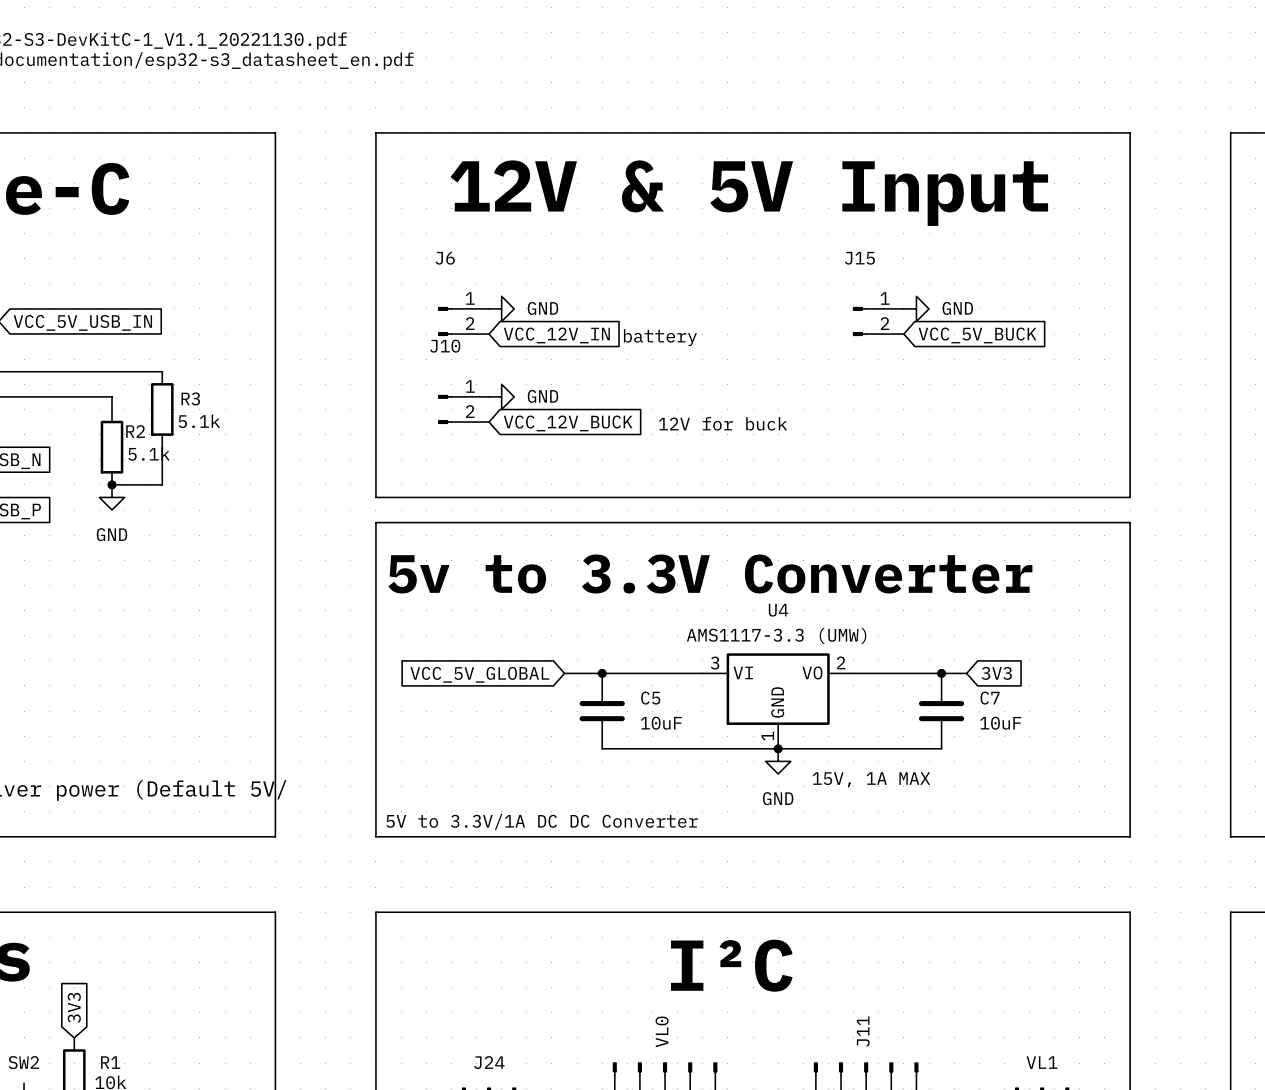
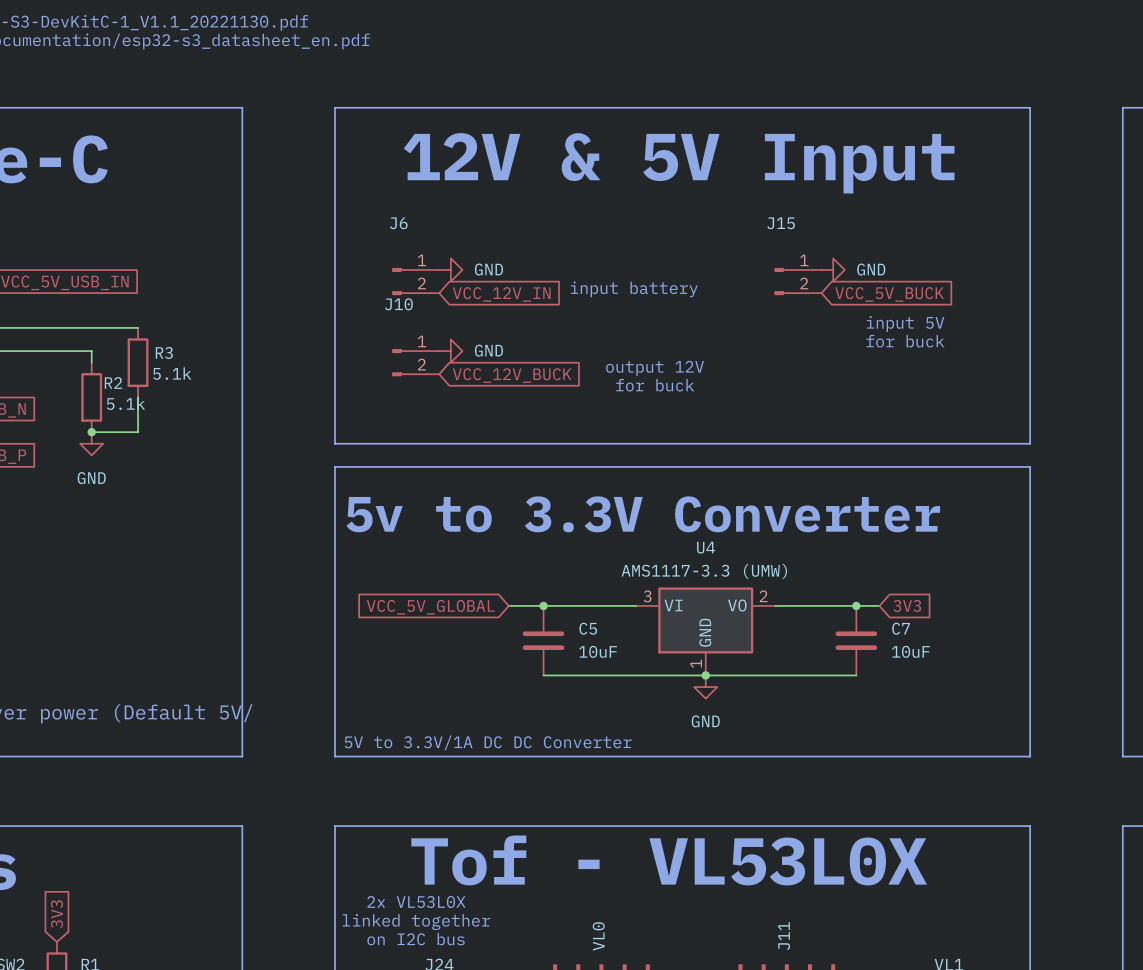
text: battery (660, 337) -> input battery (634, 289)
text: none -> input 5V (905, 324)
text: none -> for buck (905, 341)
text: none -> output 12V (655, 368)
text: 12V for buck (723, 423) -> for buck (655, 385)
text: 15V, 1A MAX (871, 779) -> none
text: none -> Tof - VL53L0X (669, 860)
text: I²C (731, 965) -> none
text: none -> 2x VL53L0X (416, 902)
text: none -> linked together (416, 922)
text: none -> on I2C bus (416, 939)

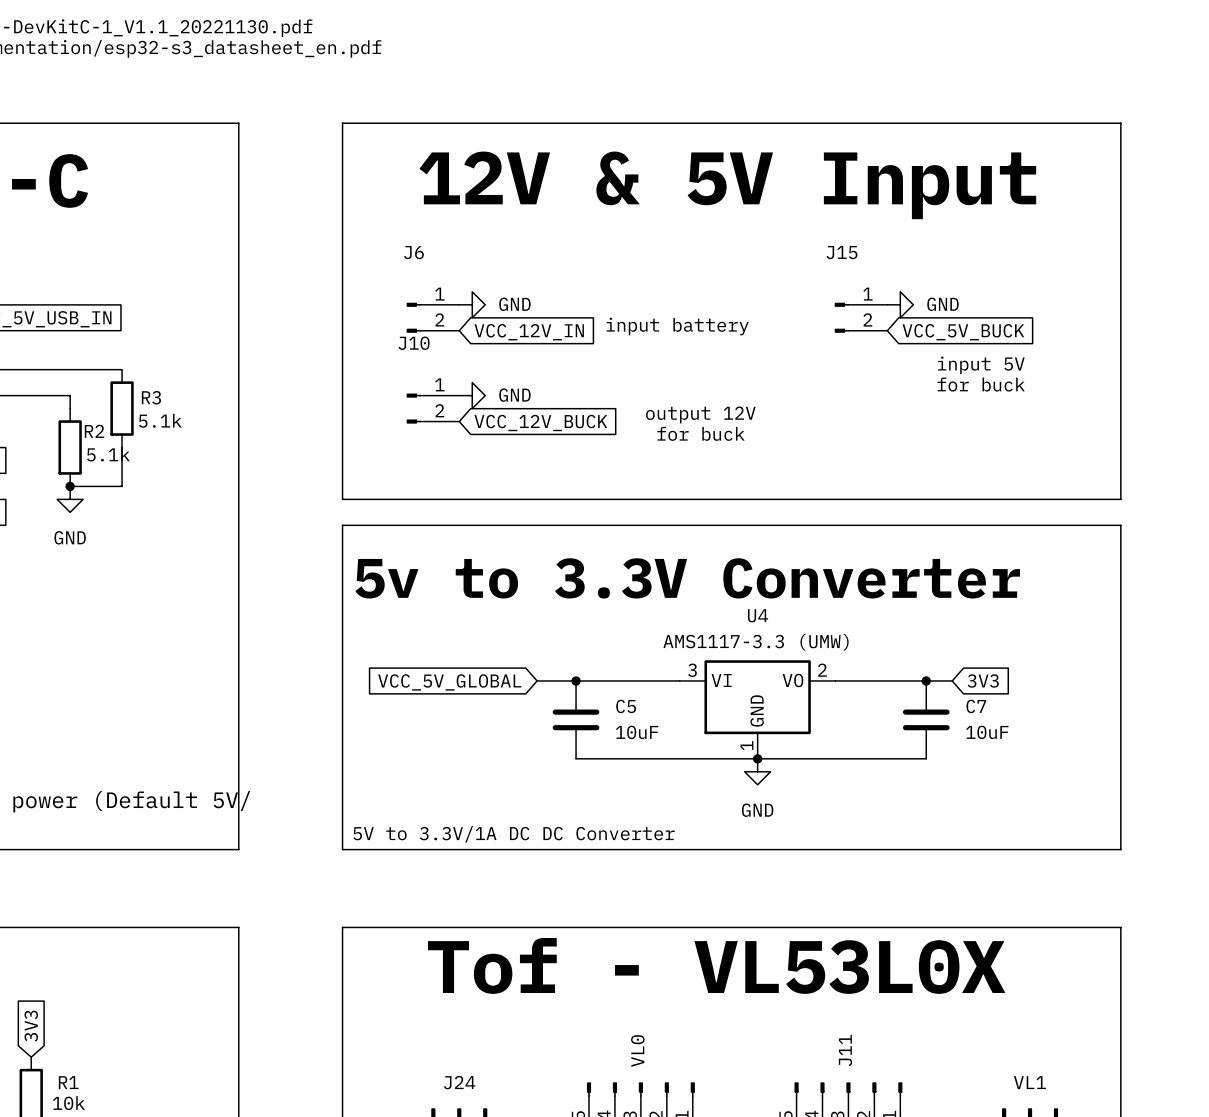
text: 2x VL53L0X (416, 902) -> none
text: linked together (416, 922) -> none
text: on I2C bus (416, 939) -> none

